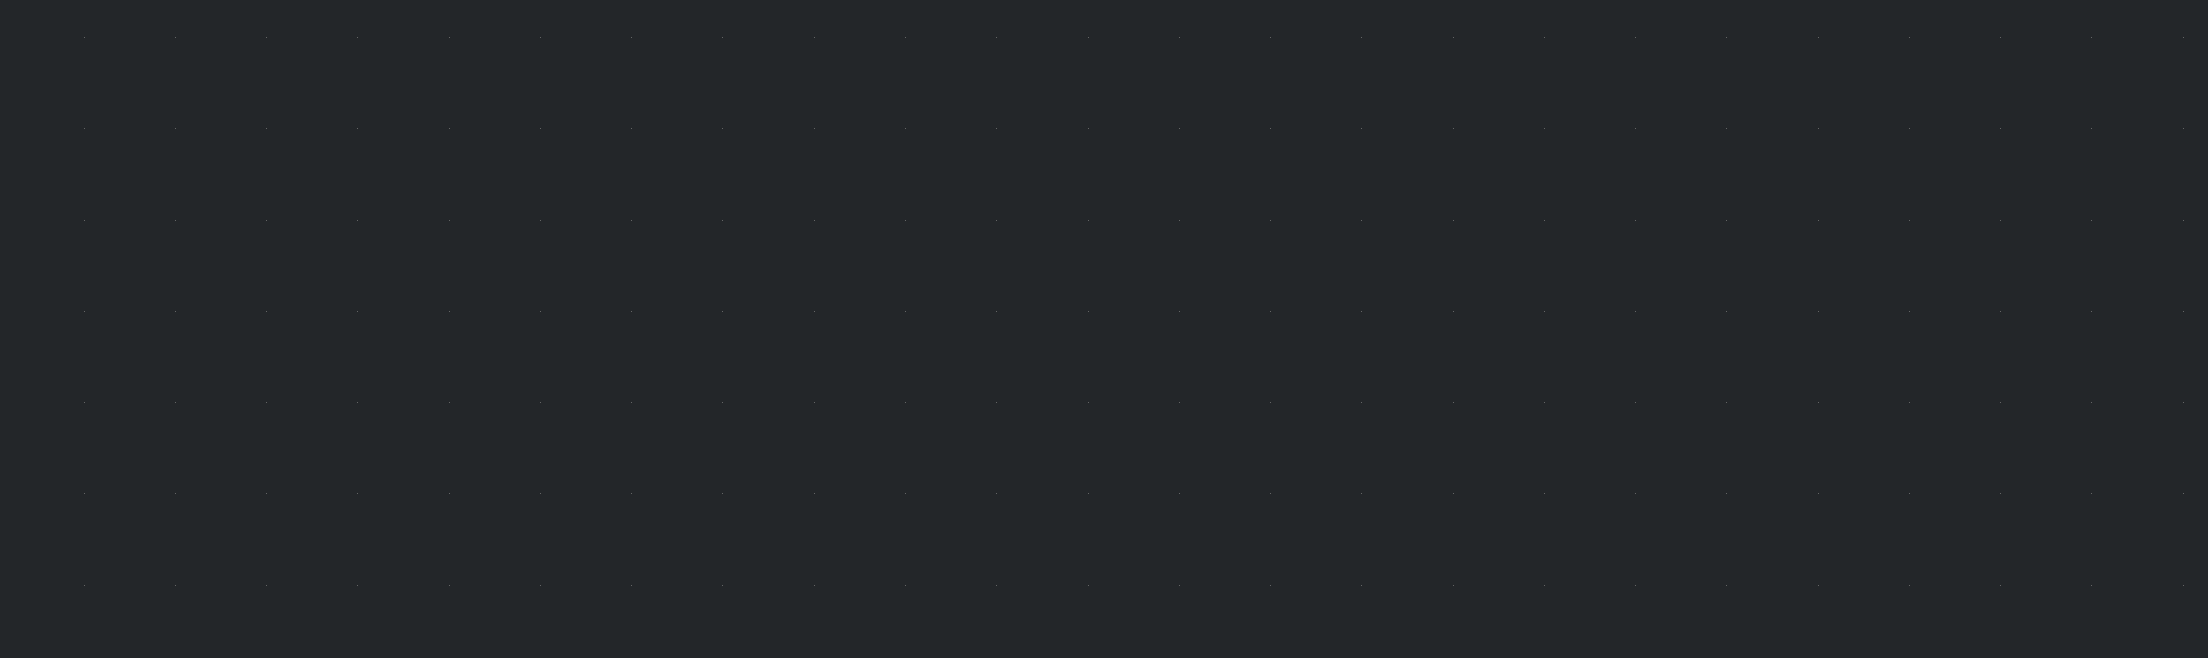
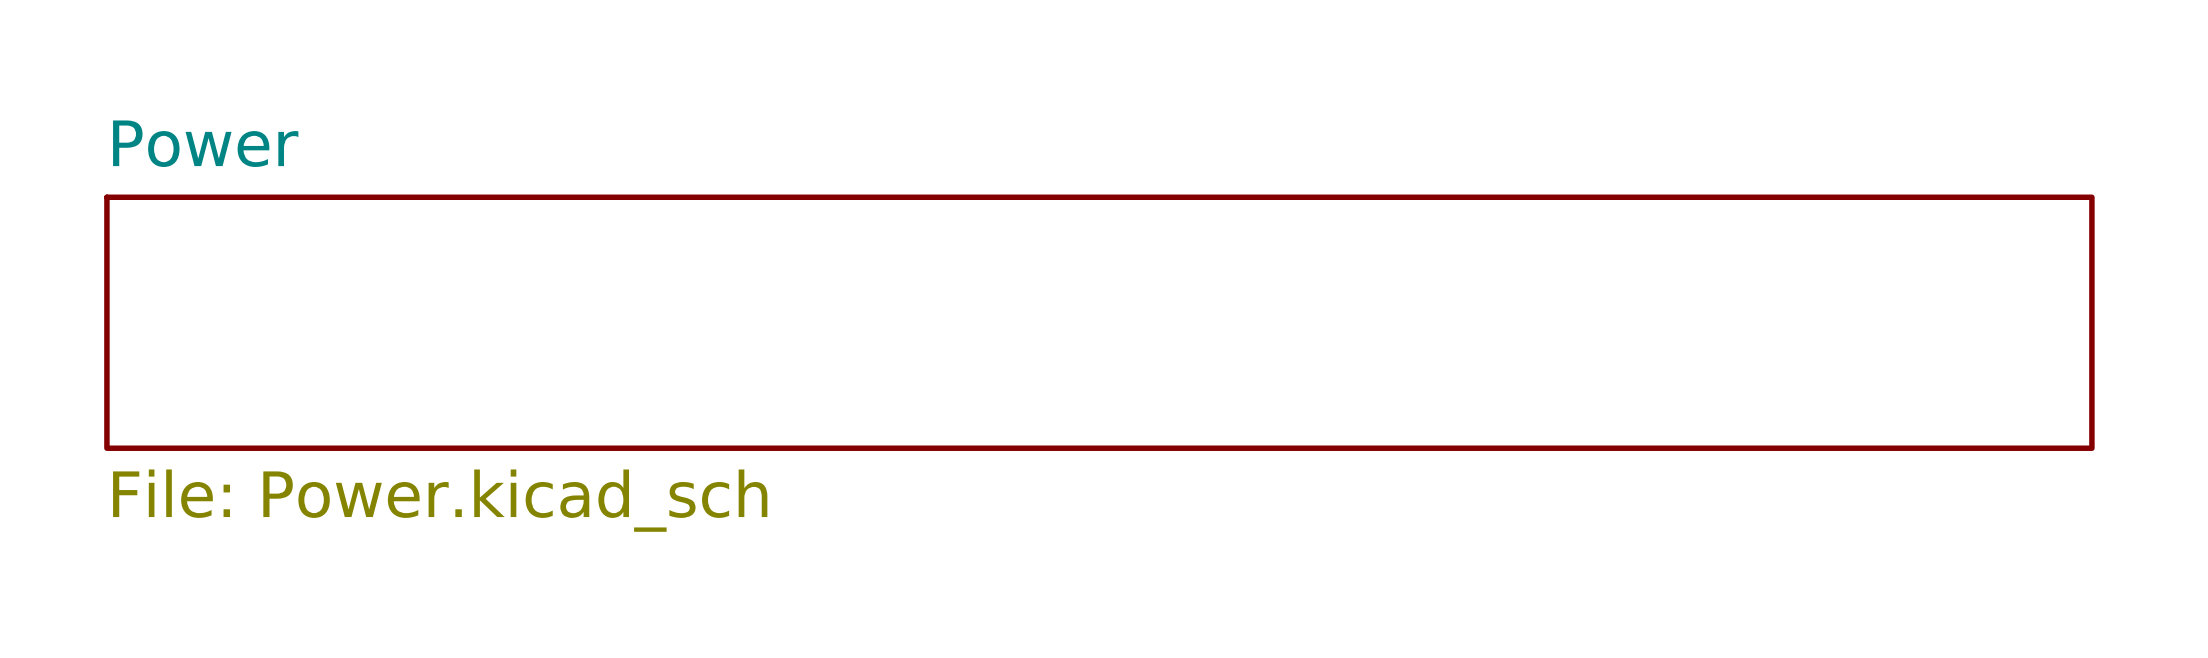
sheet Power: none -> File: Power.kicad_sch (1099, 322)

